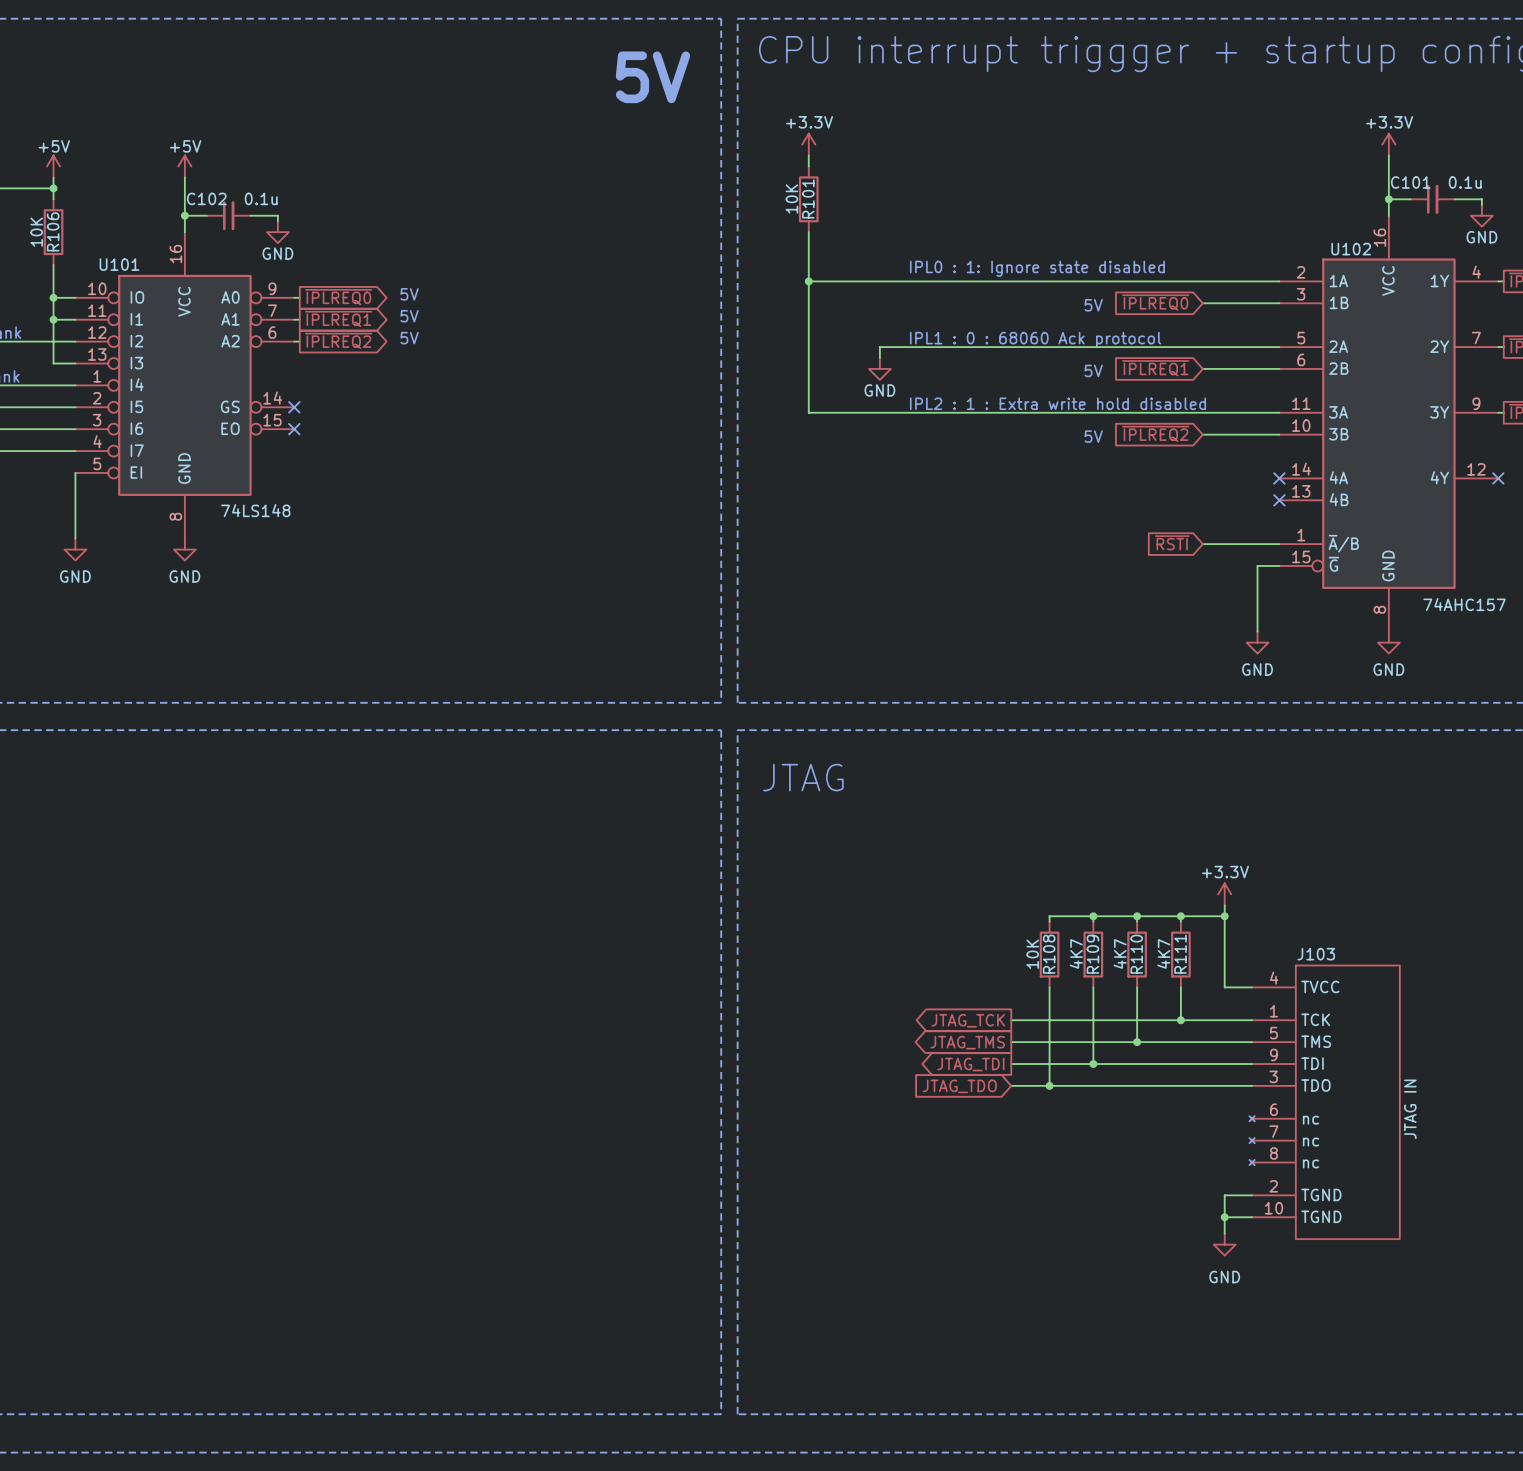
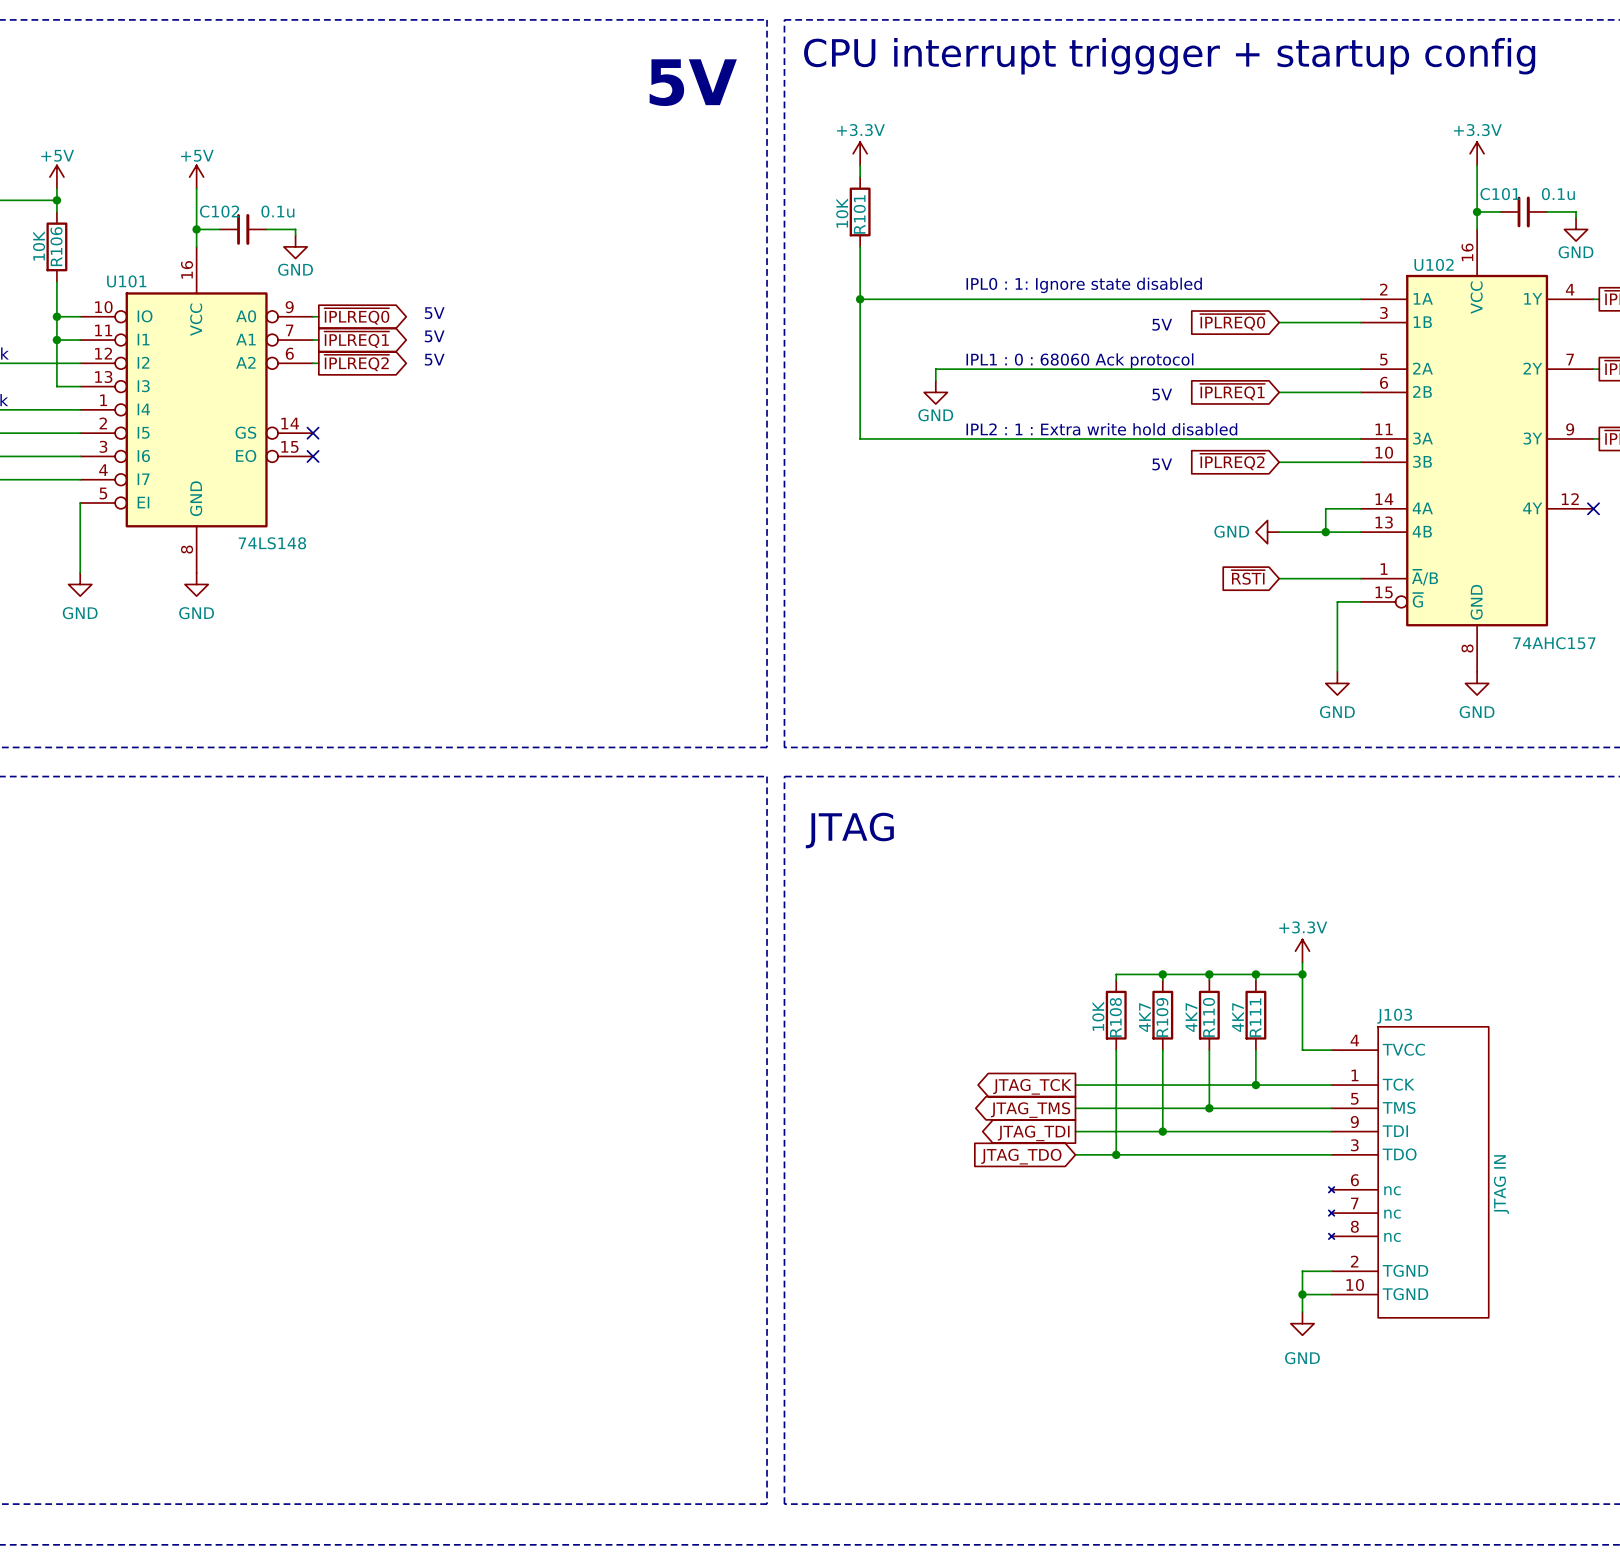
wire: none -> (1360, 508) (1325, 508) (1325, 532)
no-connect mark: (1279, 478) -> none
power symbol: none -> GND (1267, 532)
wire: none -> (1279, 532) (1360, 532)
junction: none -> (1325, 532)
no-connect mark: (1279, 500) -> none

